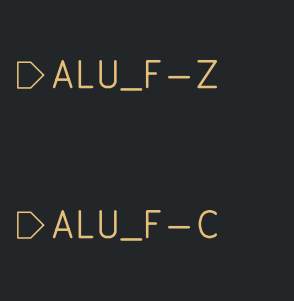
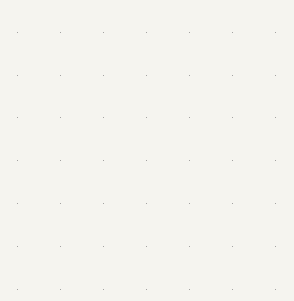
hierarchical label: ALU_F-Z (134, 75) -> none
hierarchical label: ALU_F-C (134, 225) -> none

